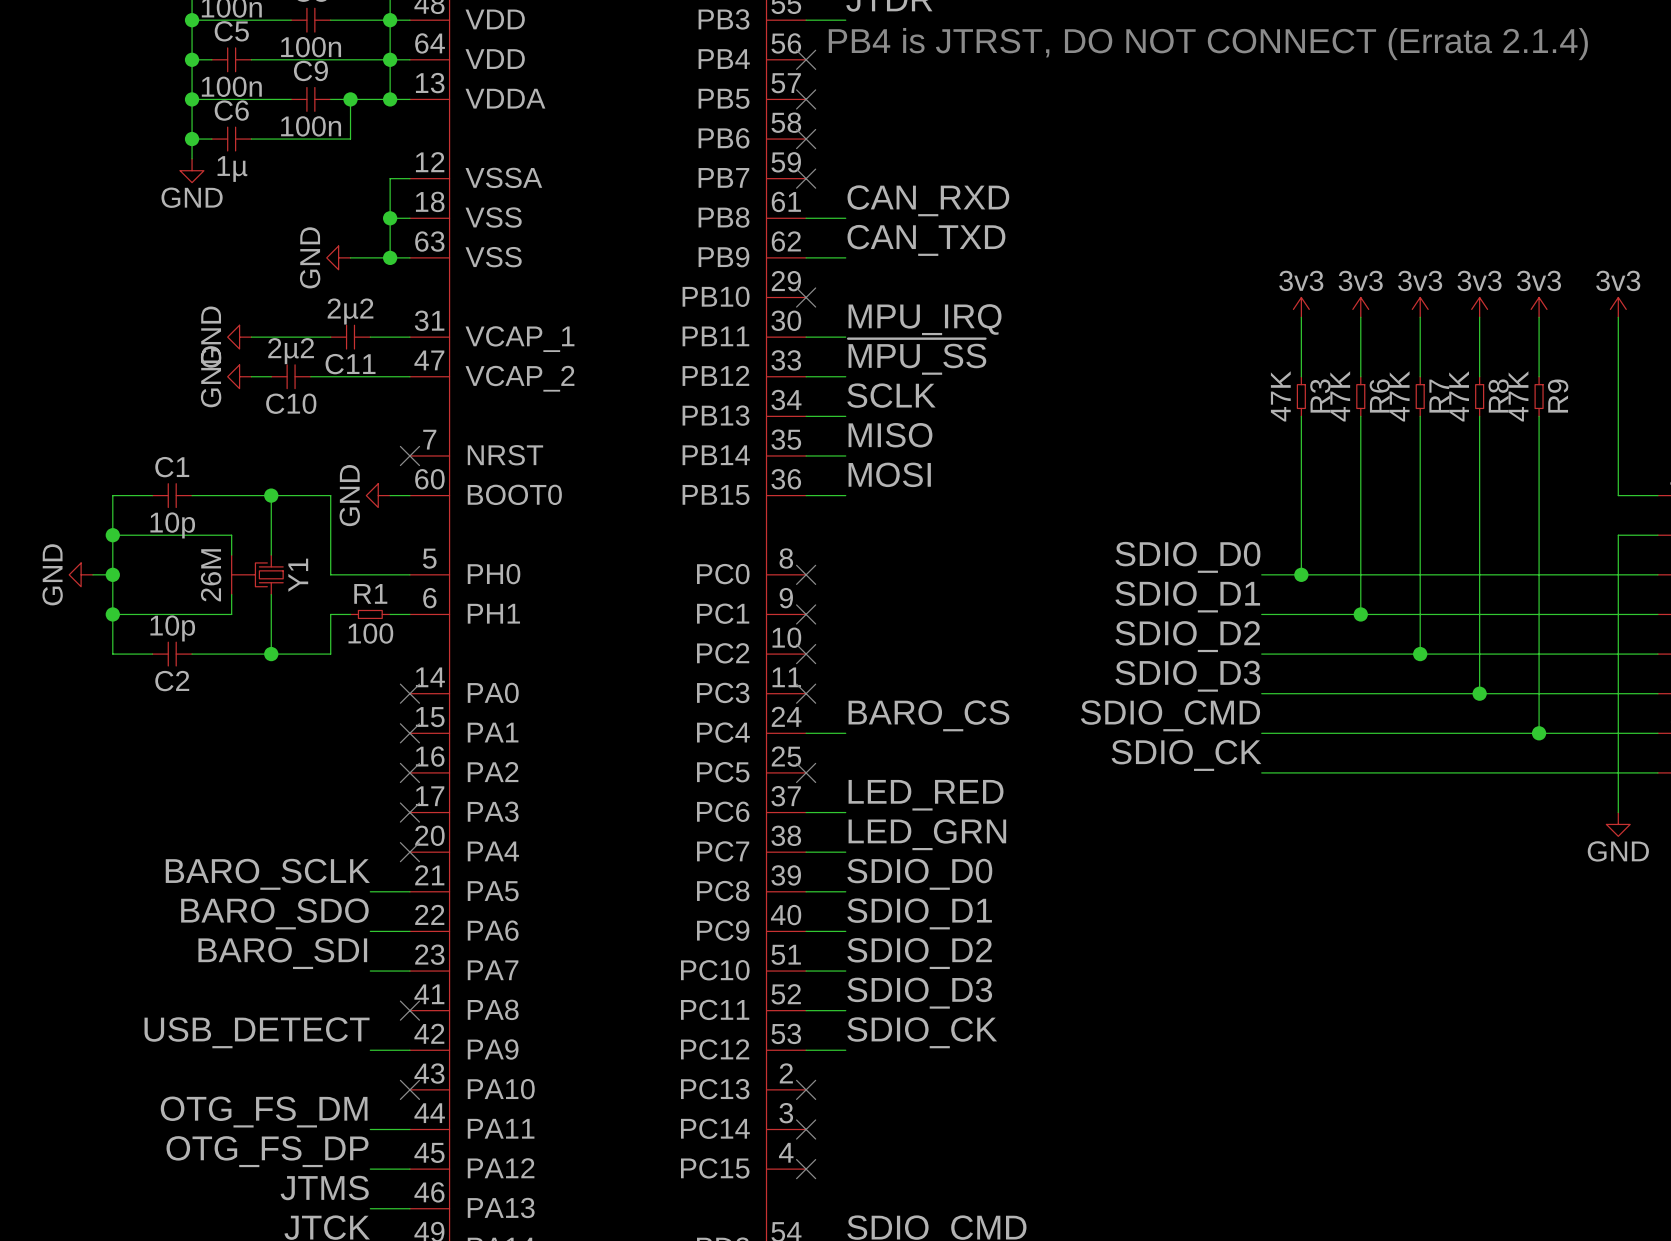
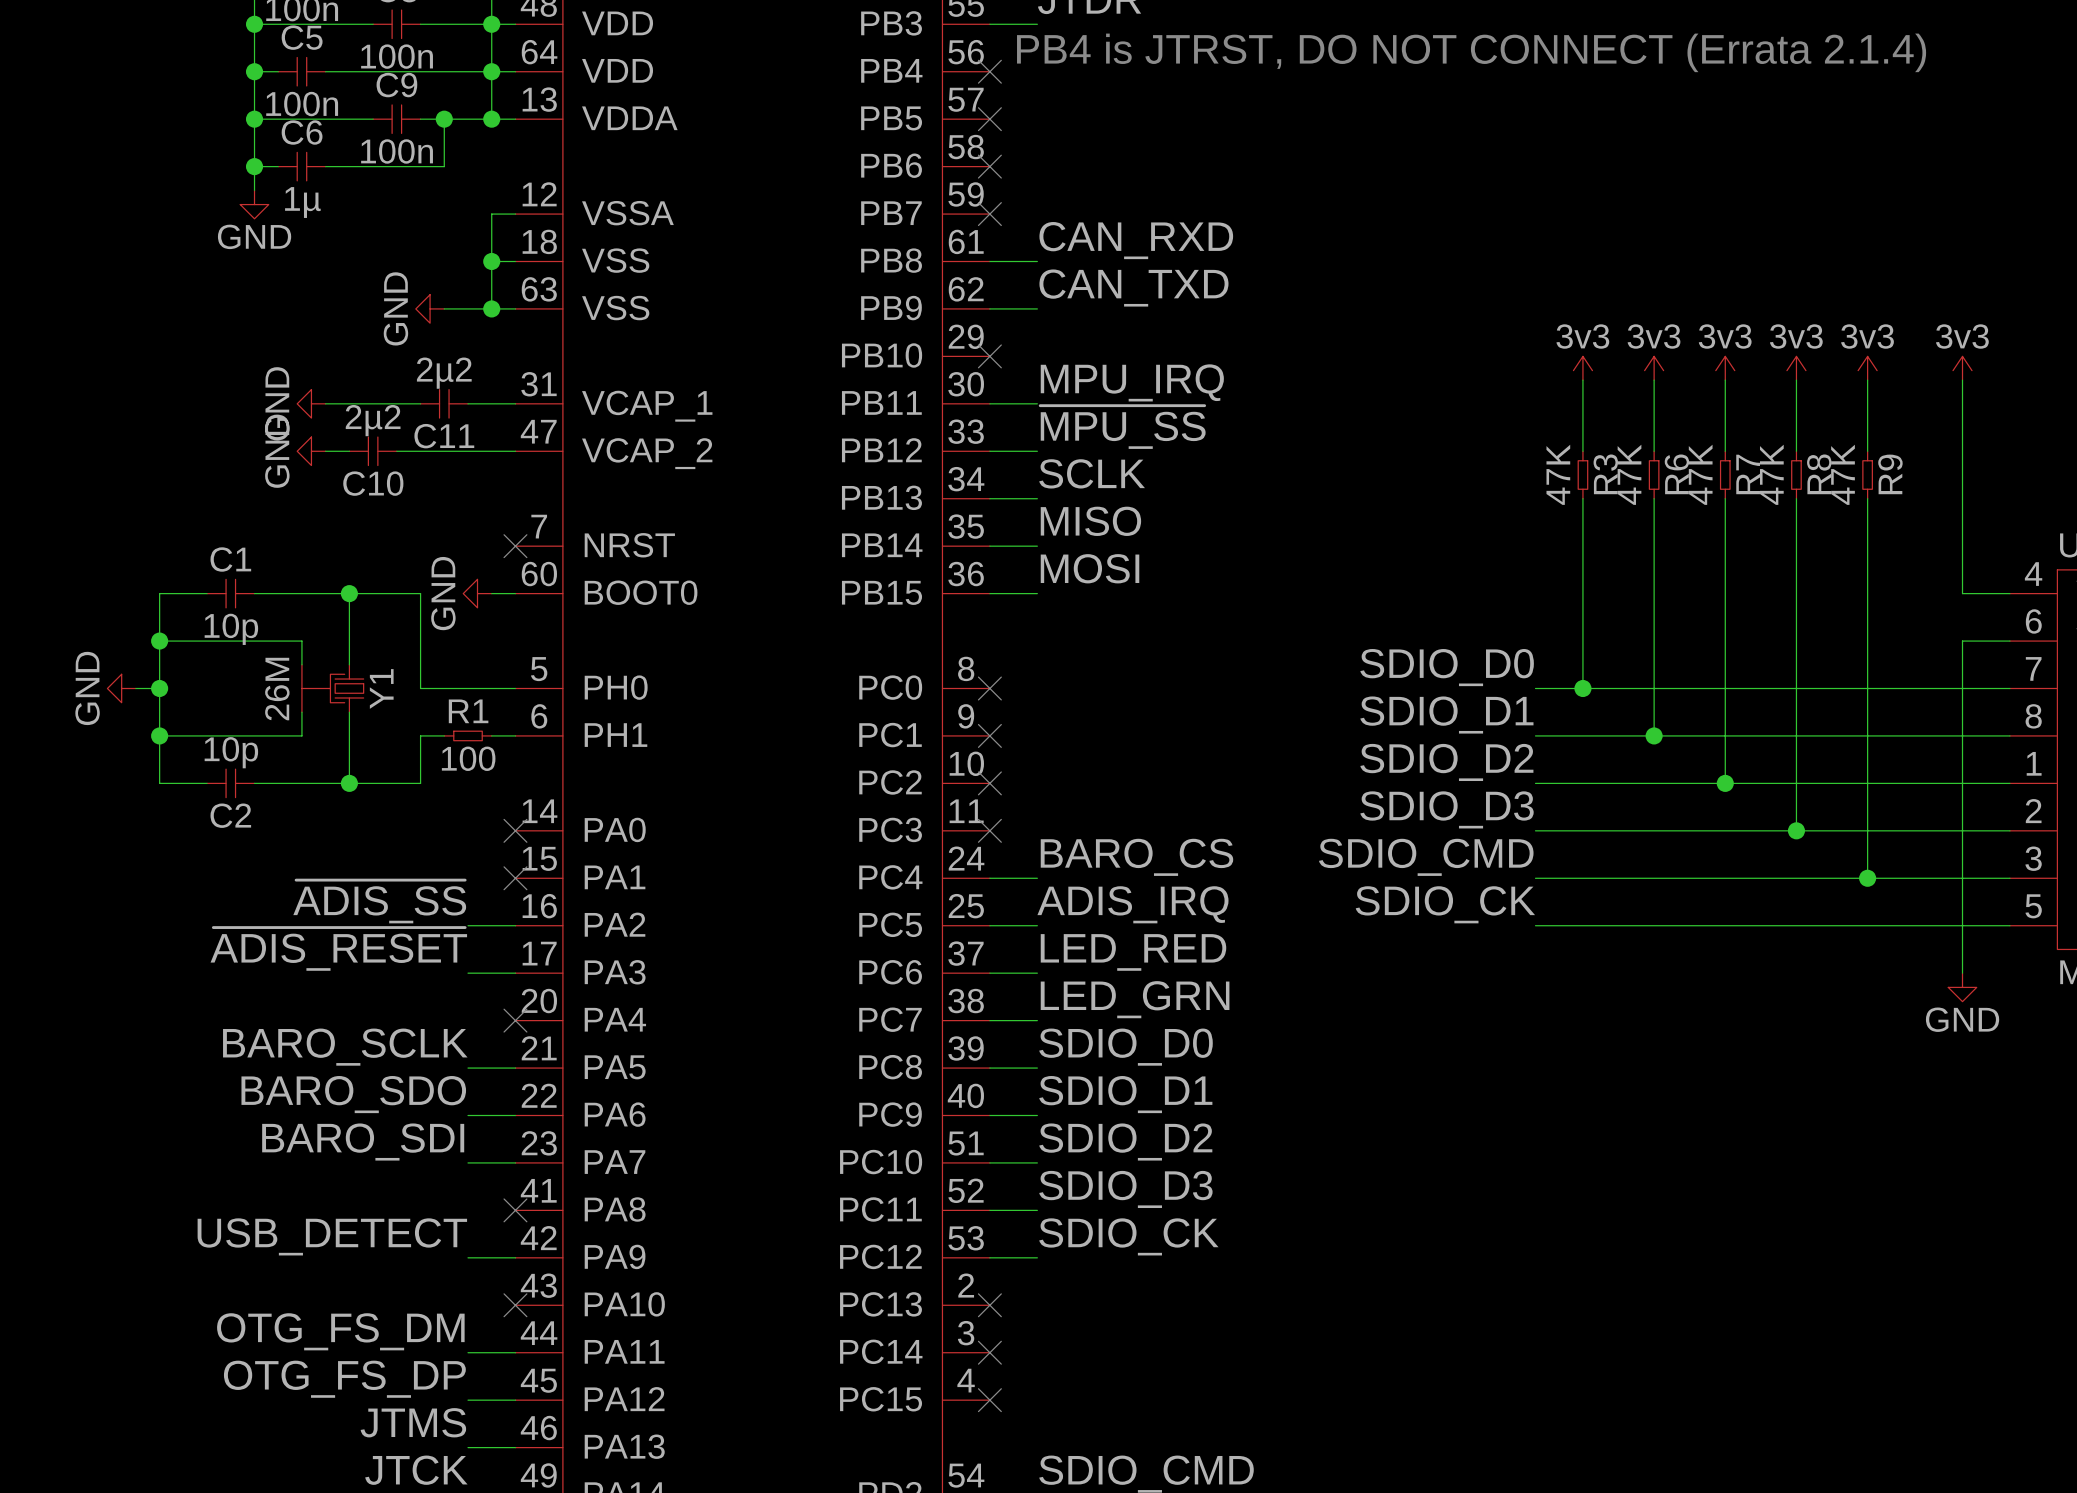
label: none -> ~{ADIS_SS} (379, 901)
label: none -> ADIS_IRQ (1132, 904)
wire: none -> (468, 925) (515, 925)
no-connect mark: (409, 772) -> none
wire: none -> (989, 925) (1037, 925)
no-connect mark: (806, 772) -> none
label: none -> ~{ADIS_RESET} (338, 949)
wire: none -> (468, 973) (515, 973)
no-connect mark: (409, 812) -> none

